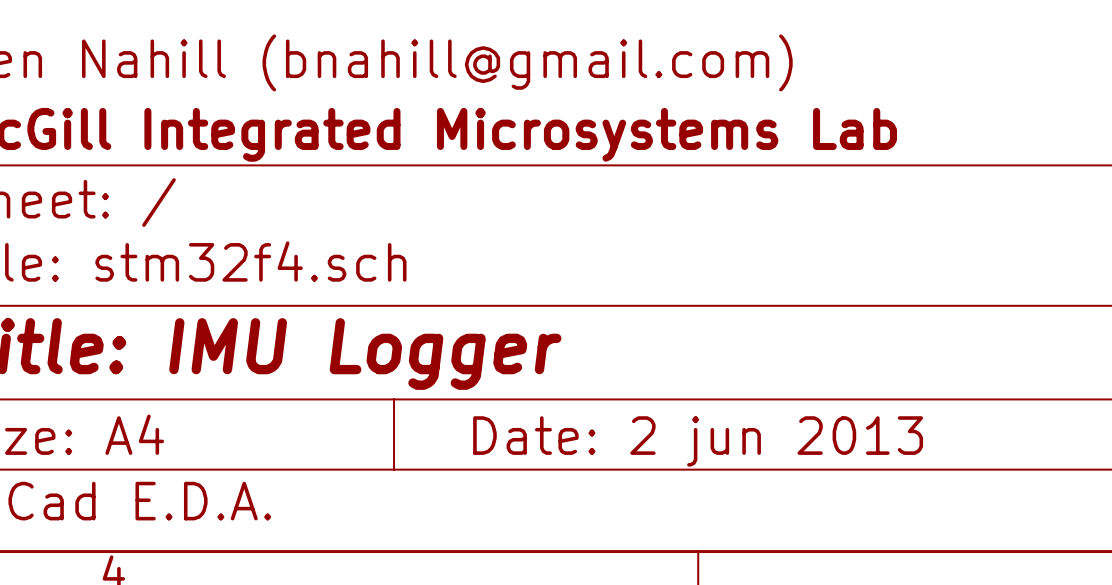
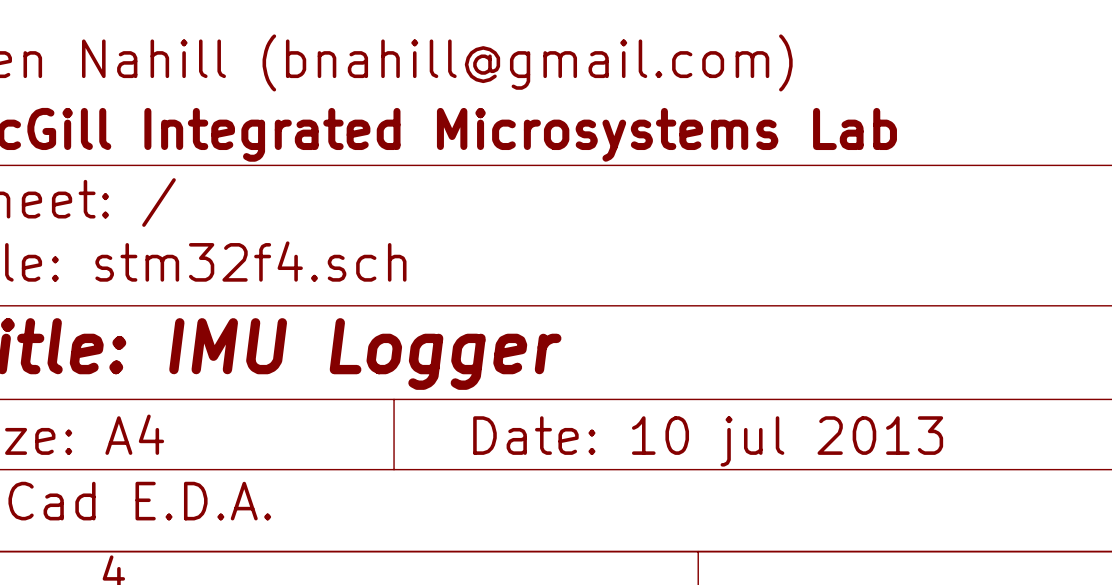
title block: Date: 2 jun 2013 (698, 441) -> Date: 10 jul 2013 (708, 441)

